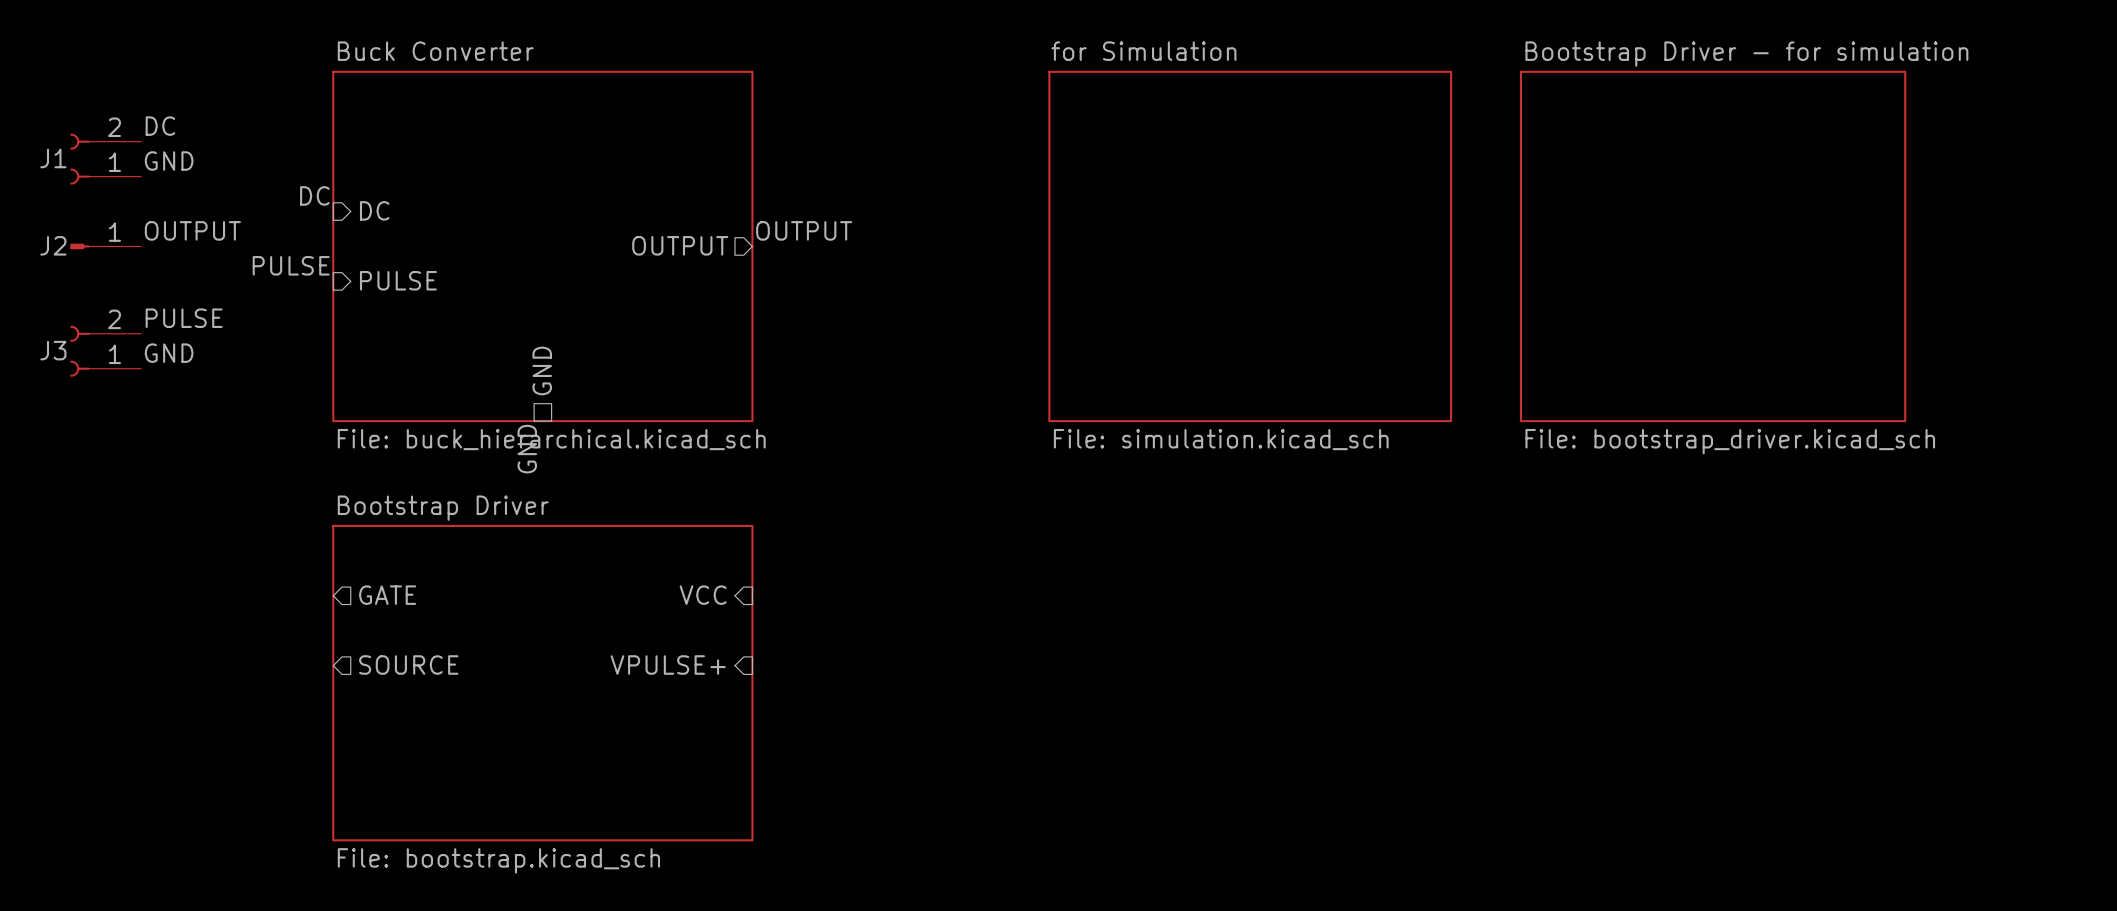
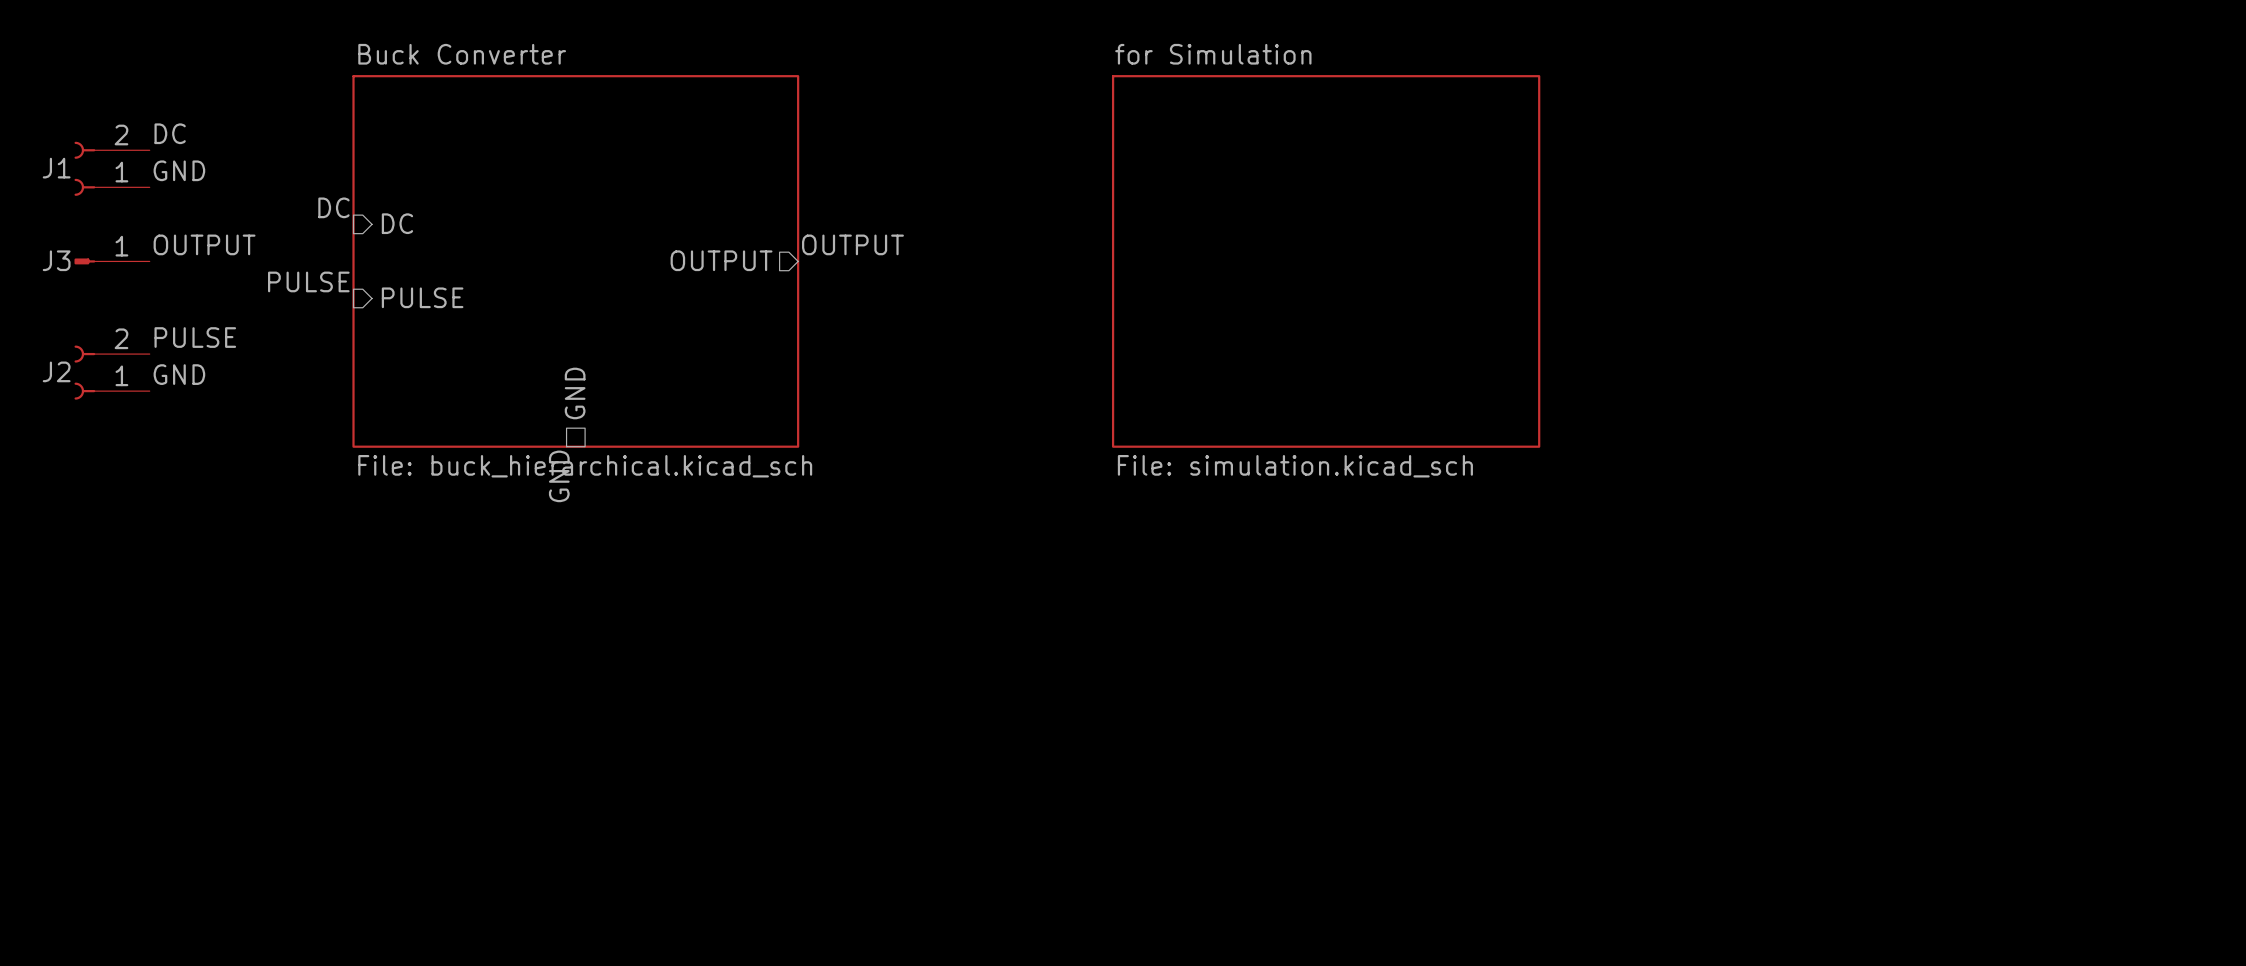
J2 name: J2 (53, 245) -> J3 (56, 260)
sheet Bootstrap Driver - for simulation: File: bootstrap_driver.kicad_sch (1713, 246) -> none
J3 name: J3 (53, 350) -> J2 (56, 371)
sheet pin: GATE (387, 595) -> none
sheet pin: VCC (703, 595) -> none
sheet pin: SOURCE (408, 665) -> none
sheet pin: VPULSE+ (668, 665) -> none
sheet Bootstrap Driver: File: bootstrap.kicad_sch (542, 683) -> none

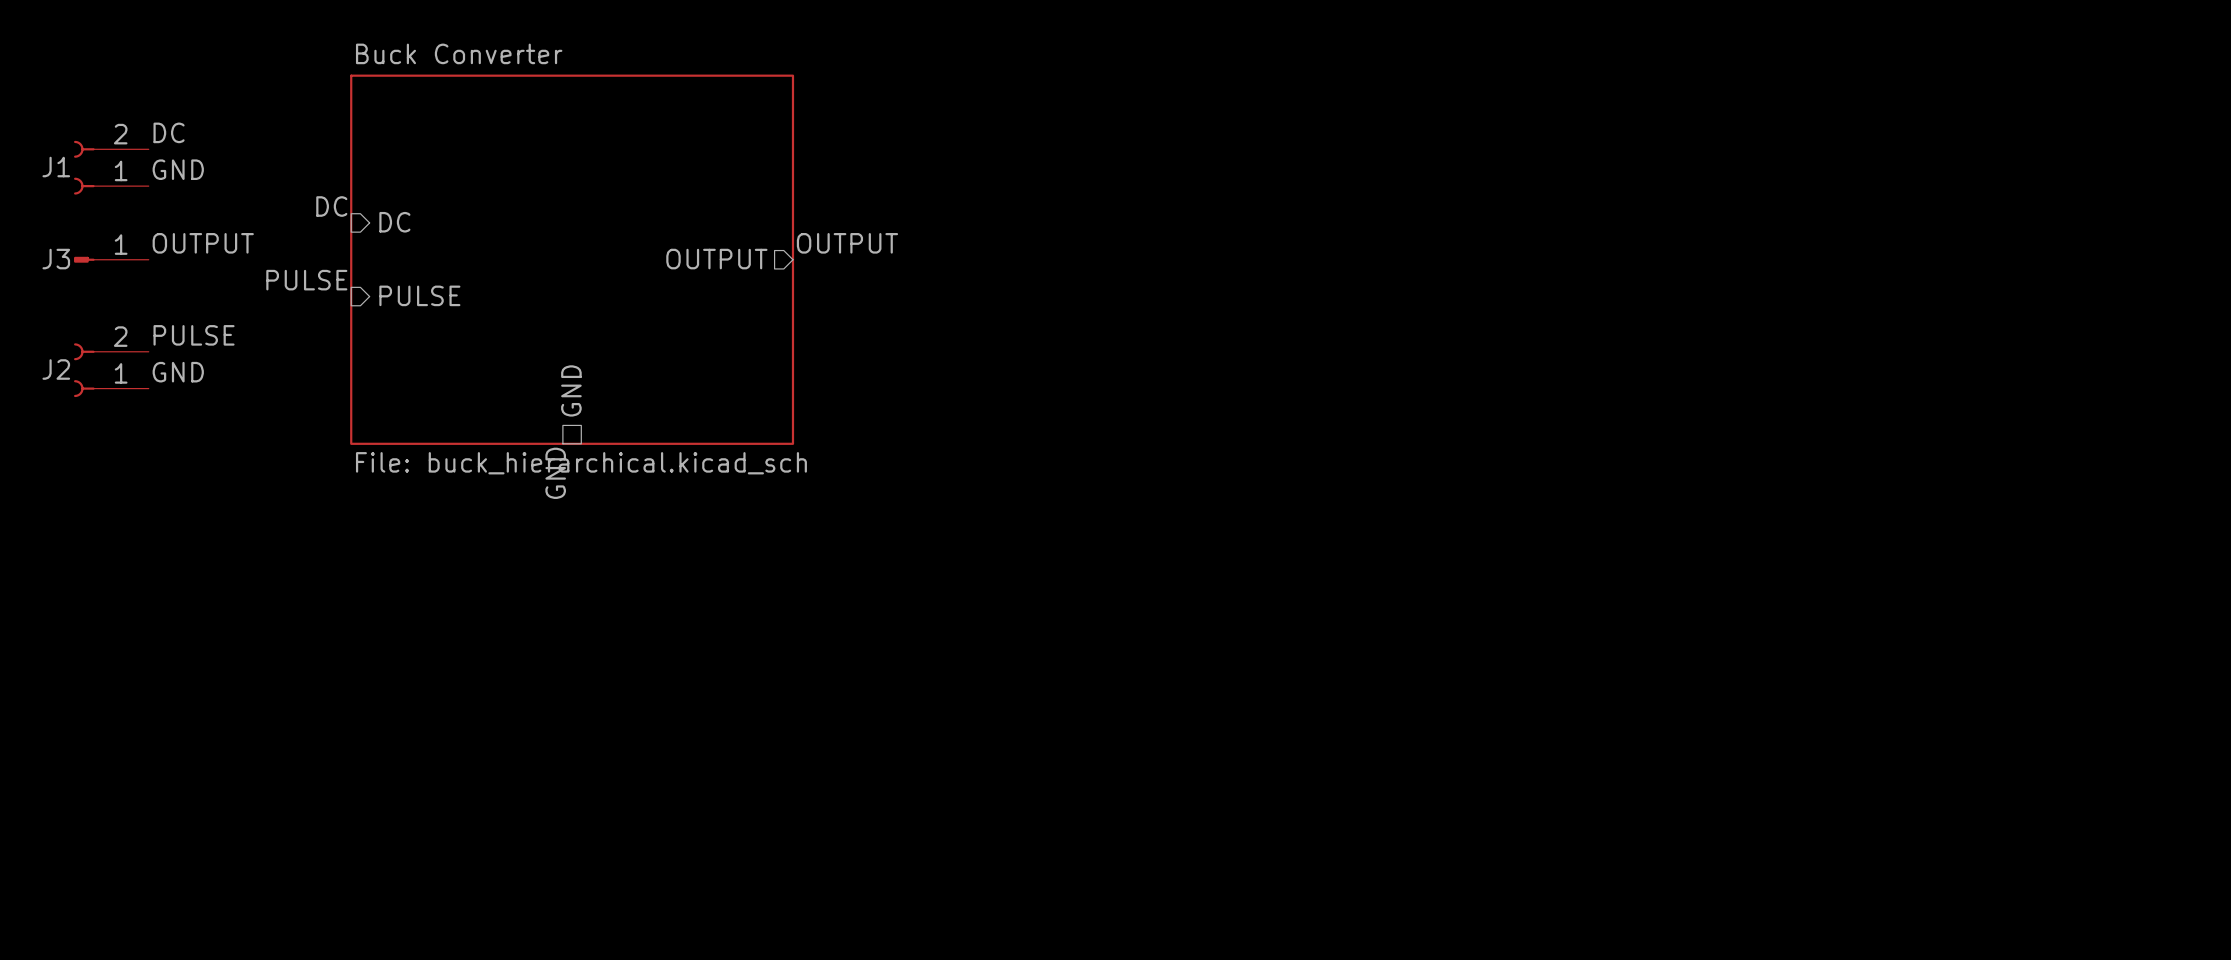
sheet for Simulation: File: simulation.kicad_sch (1326, 261) -> none

